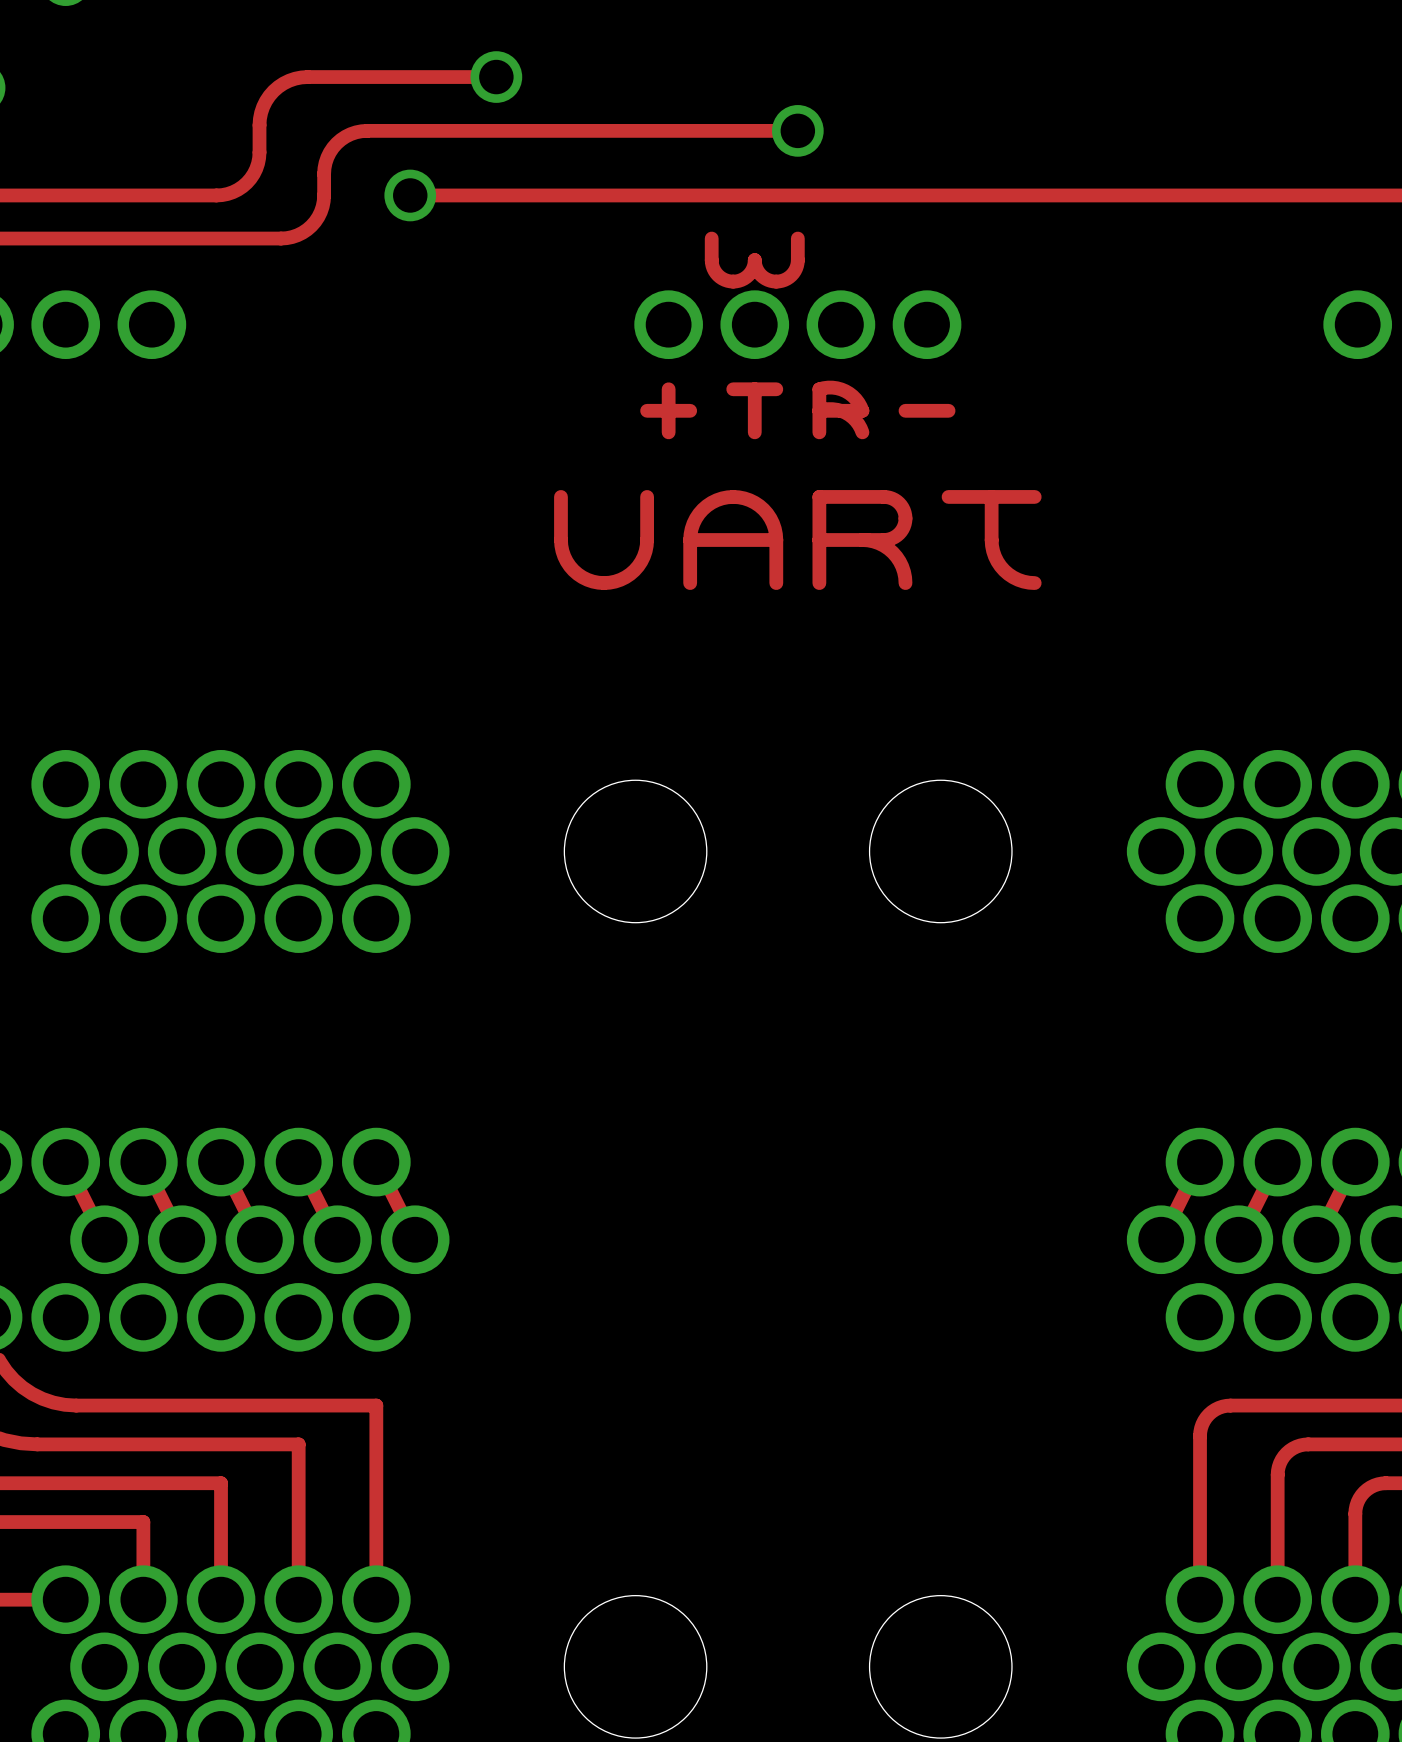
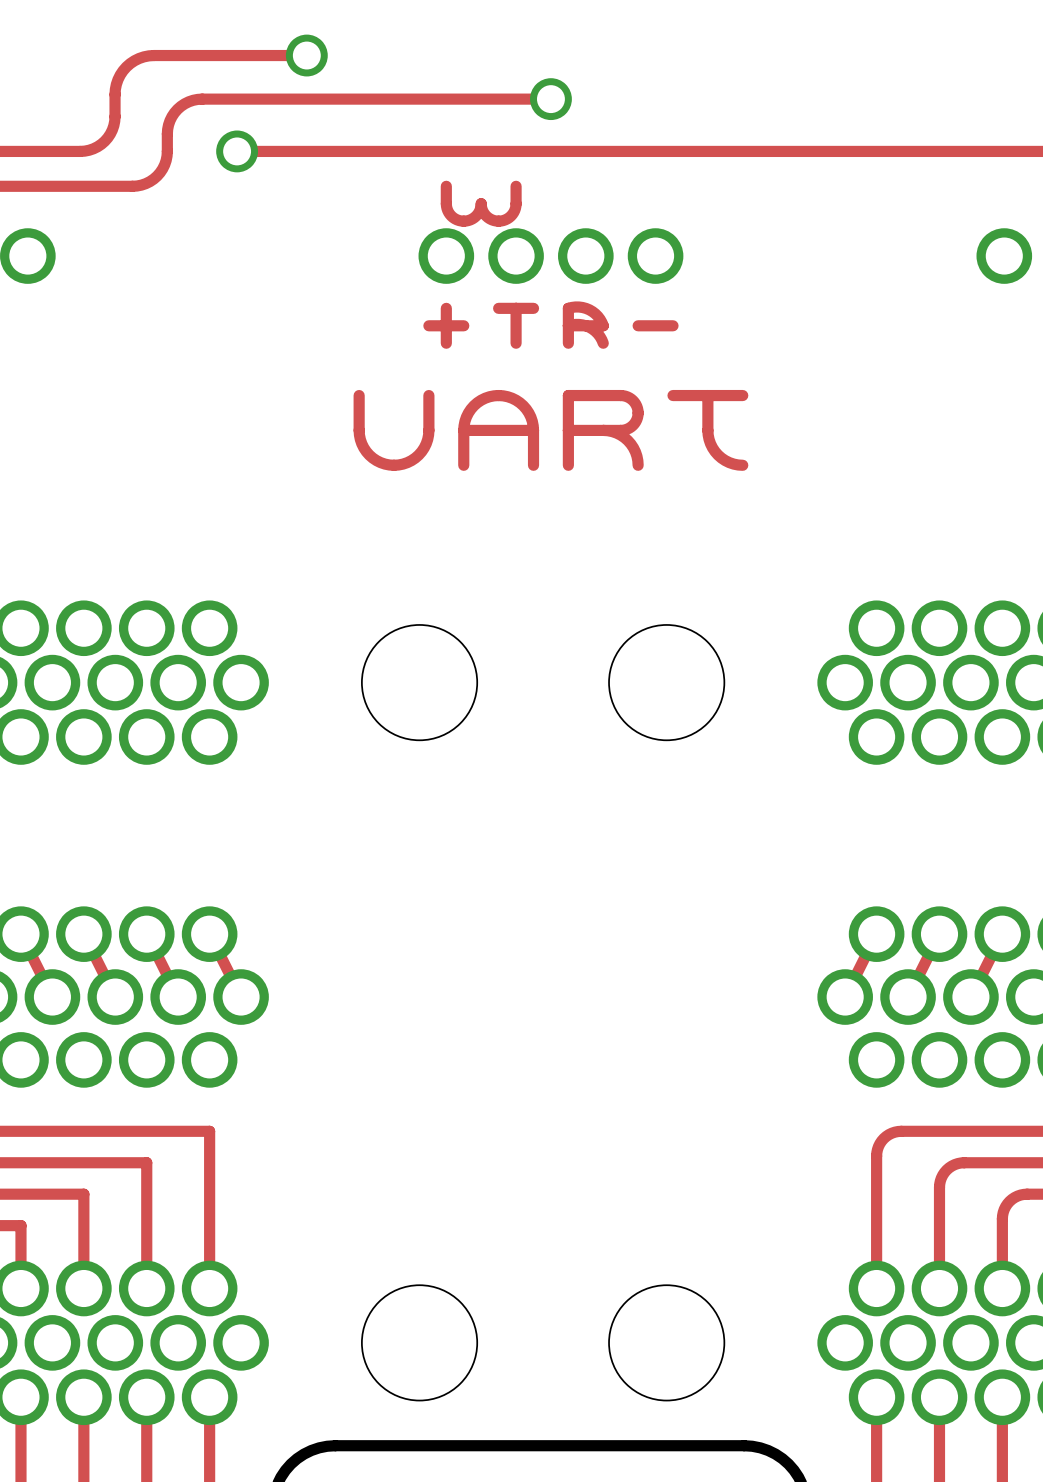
track: (711, 238) (711, 260) -> (446, 186) (446, 208) (455, 218) (463, 221) (472, 218) (478, 212) (481, 203)
track: (797, 238) (797, 265) (793, 273) (787, 278) (776, 281) (765, 278) (757, 270) (754, 260) -> (516, 186) (516, 203)

